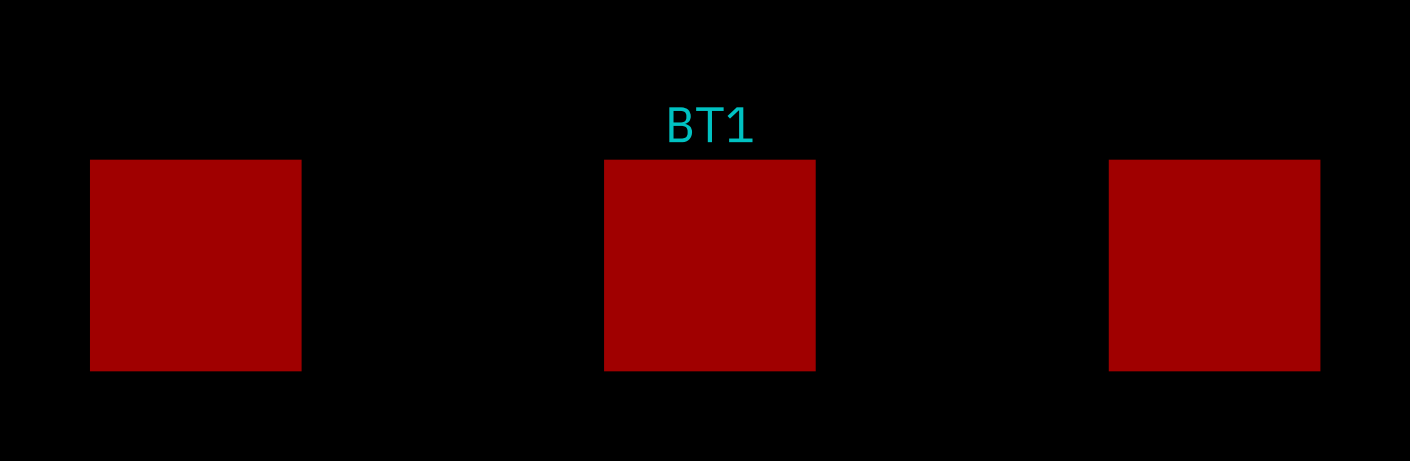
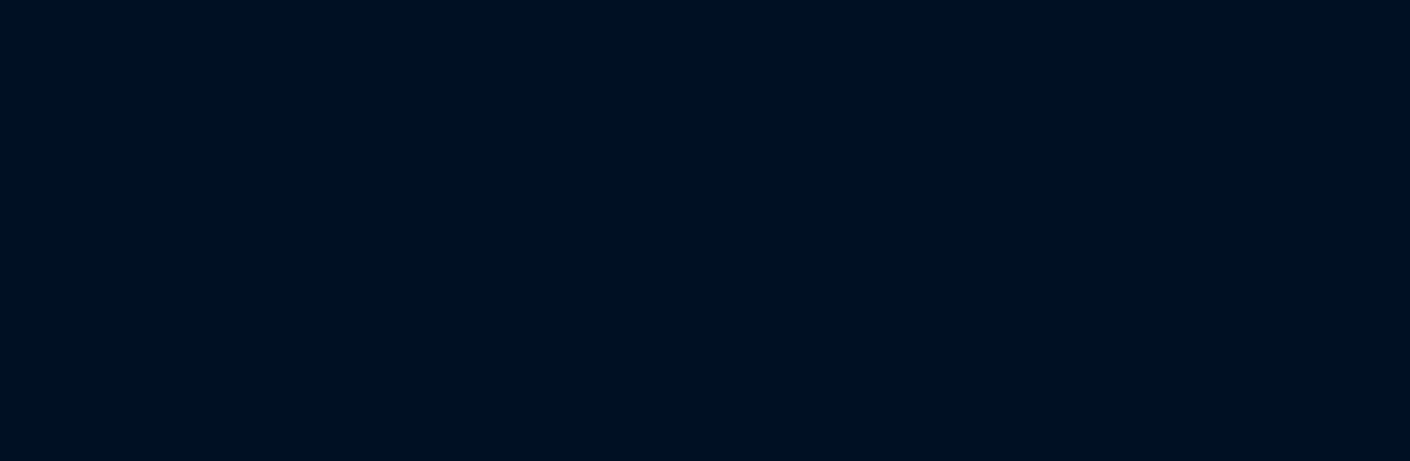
BT1: (705, 265) -> none

